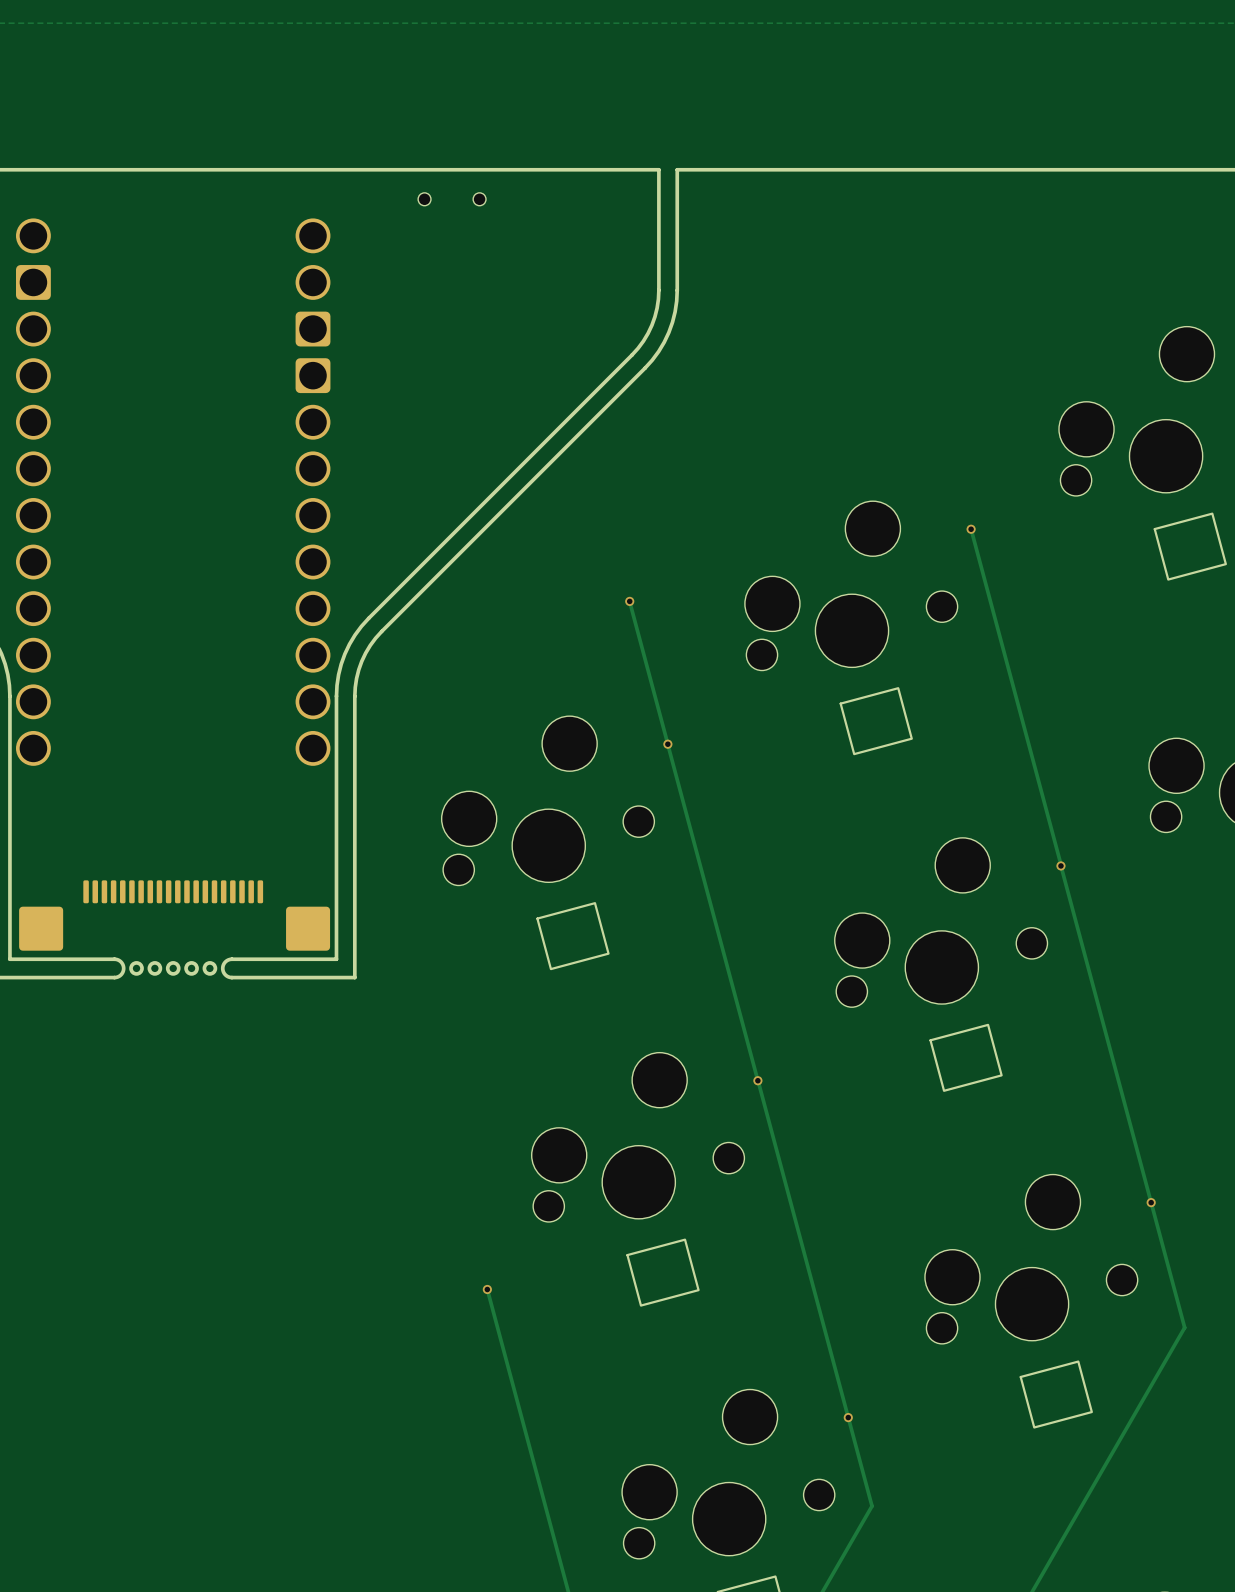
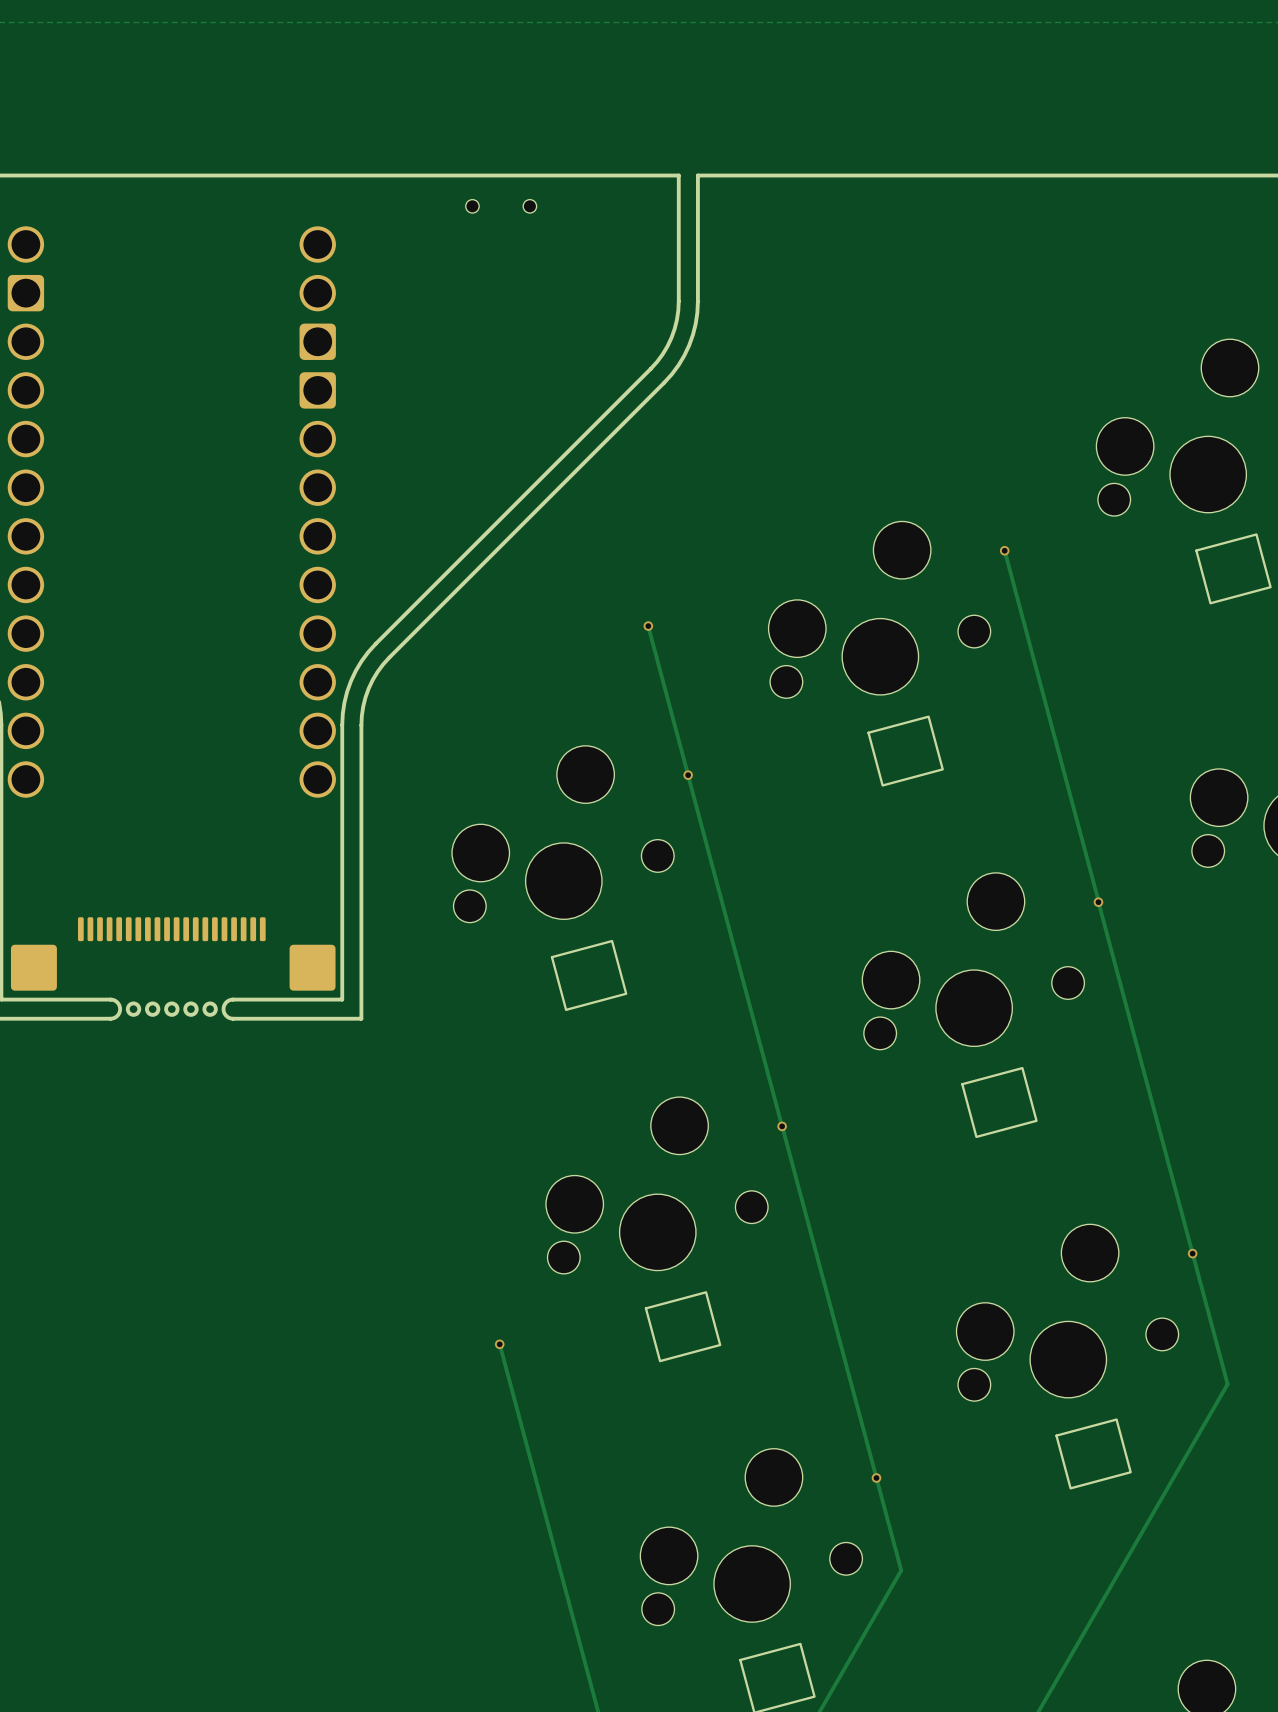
part position: (452, 199) -> (501, 206)

